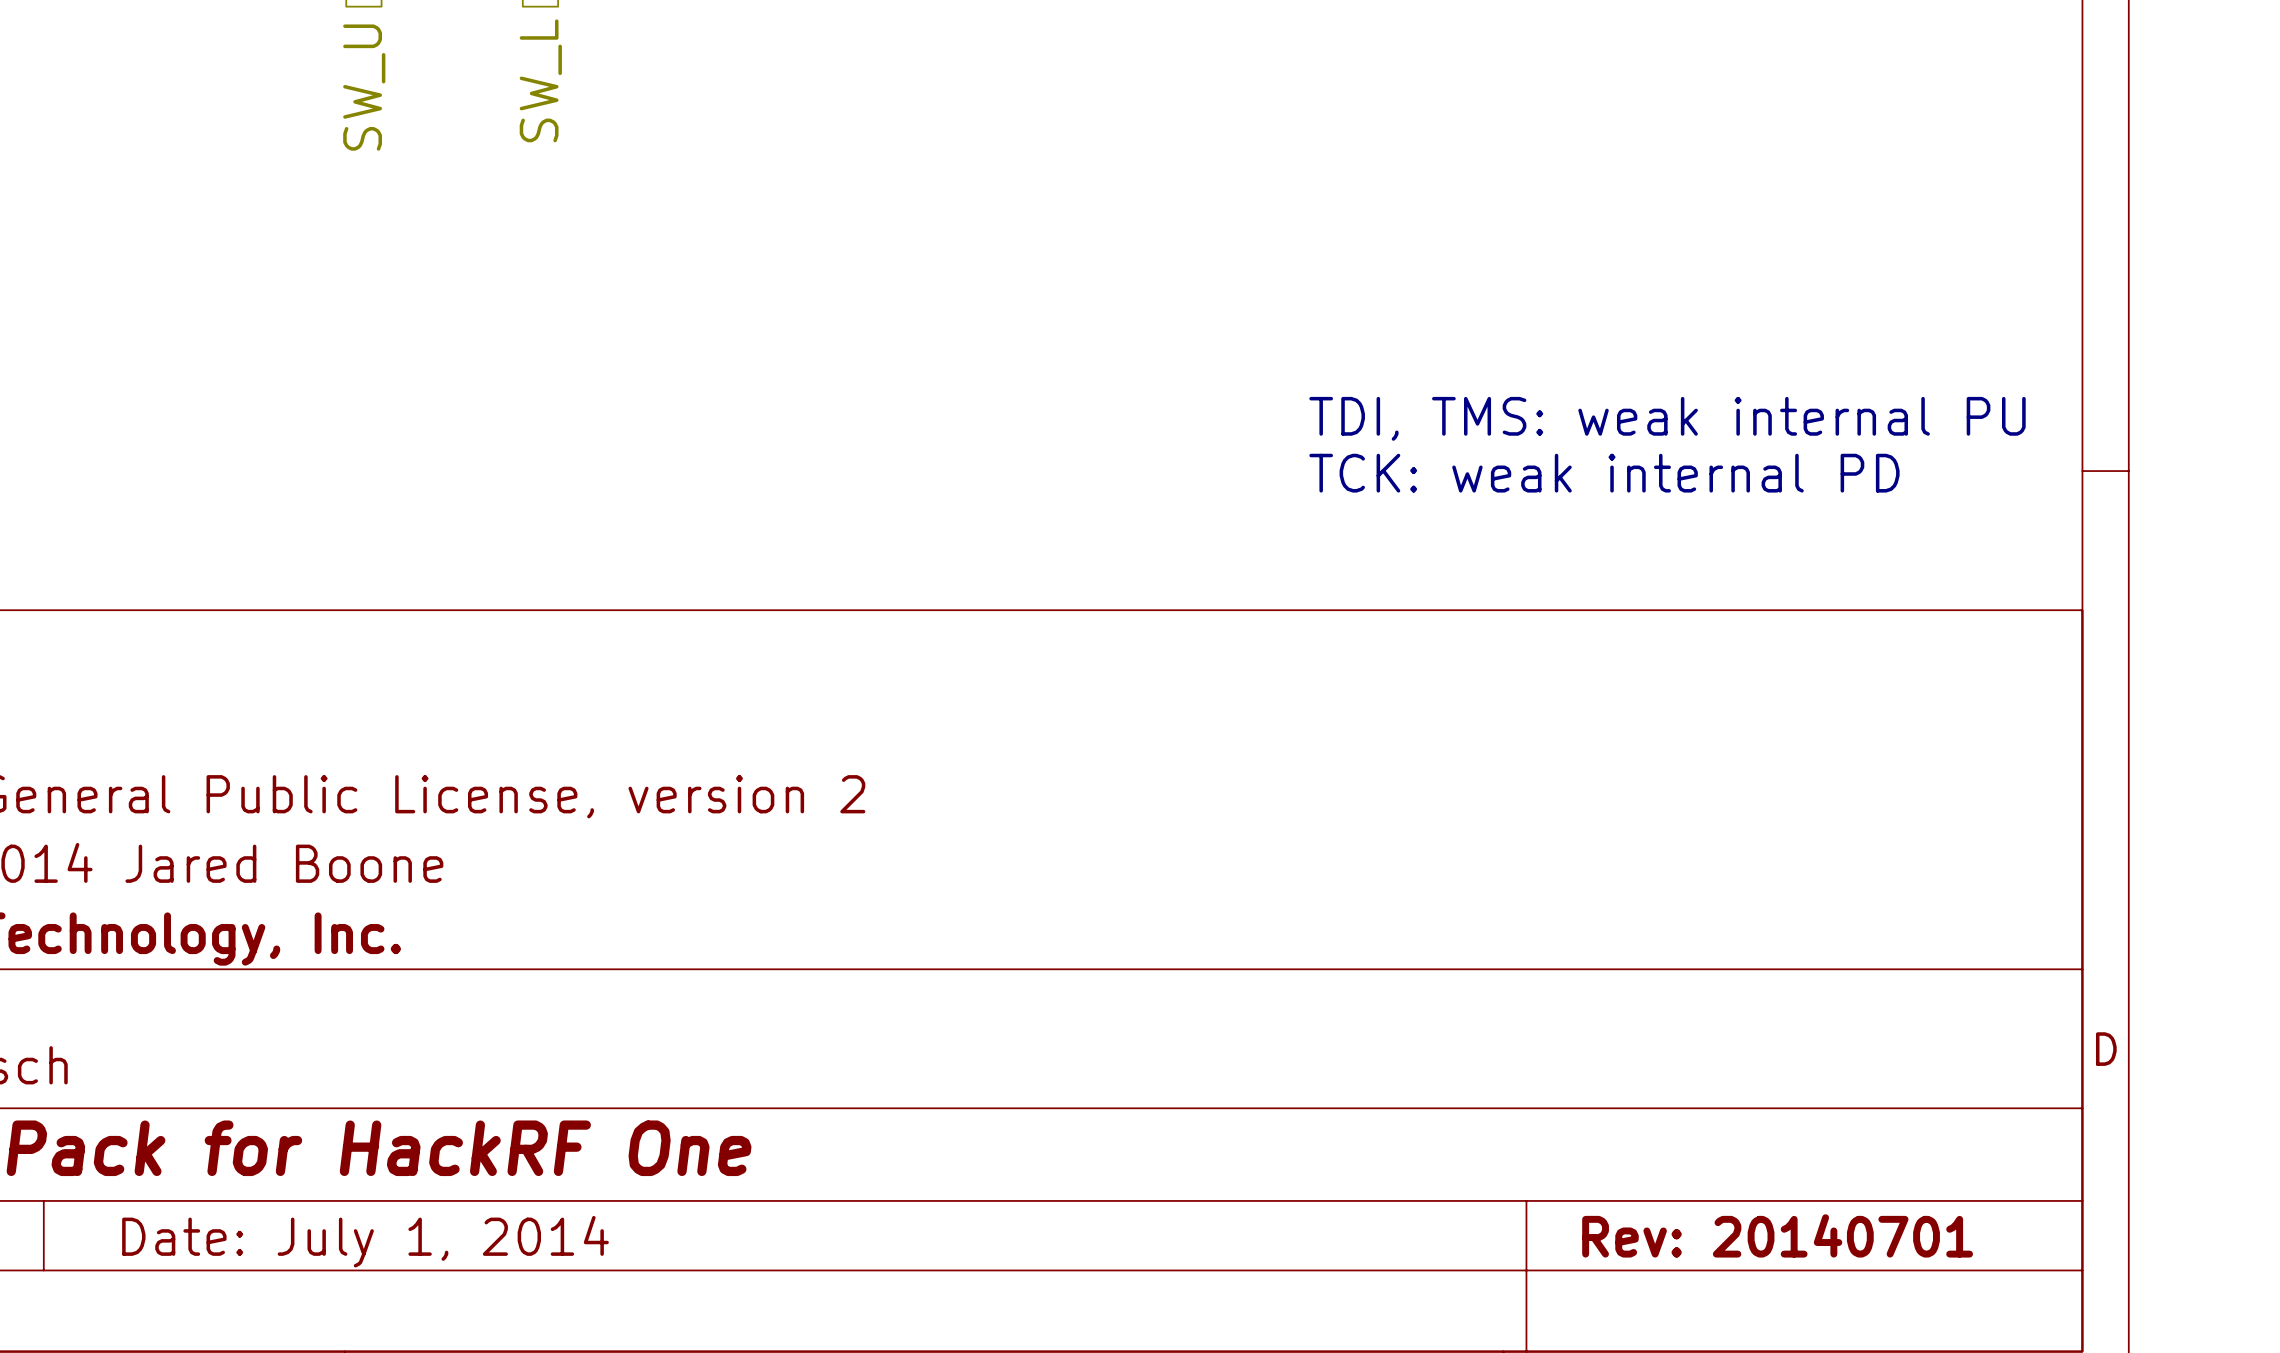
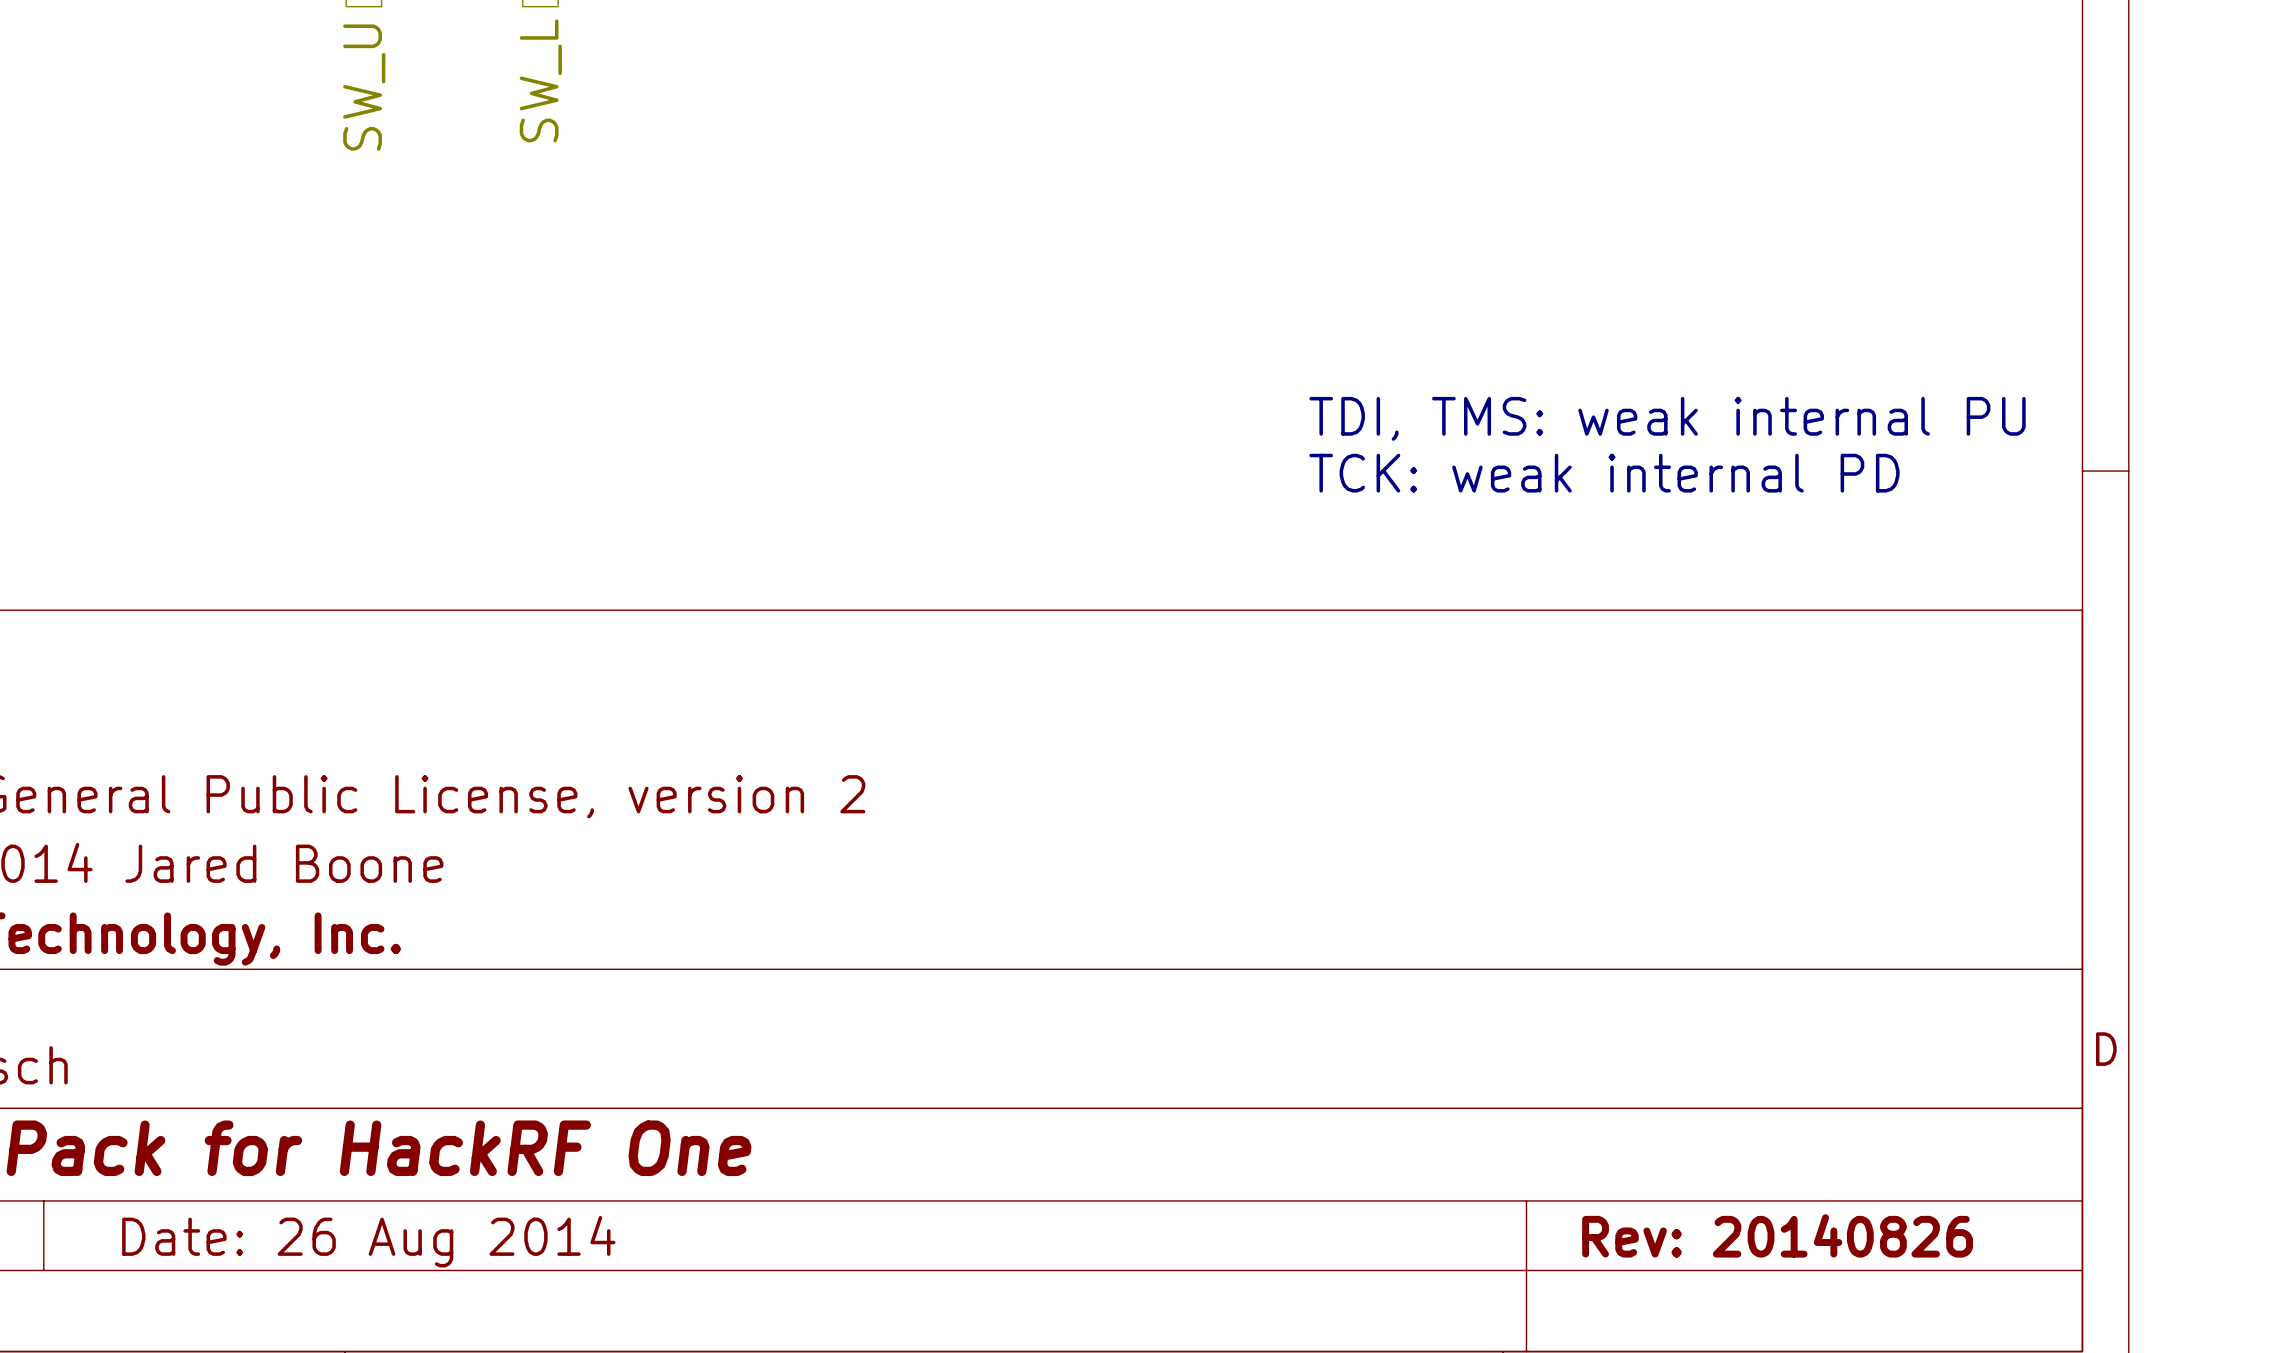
title block: Rev: 20140701 (1777, 1235) -> Rev: 20140826 (1777, 1235)
title block: Date: July 1, 2014 (365, 1241) -> Date: 26 Aug 2014 (368, 1241)

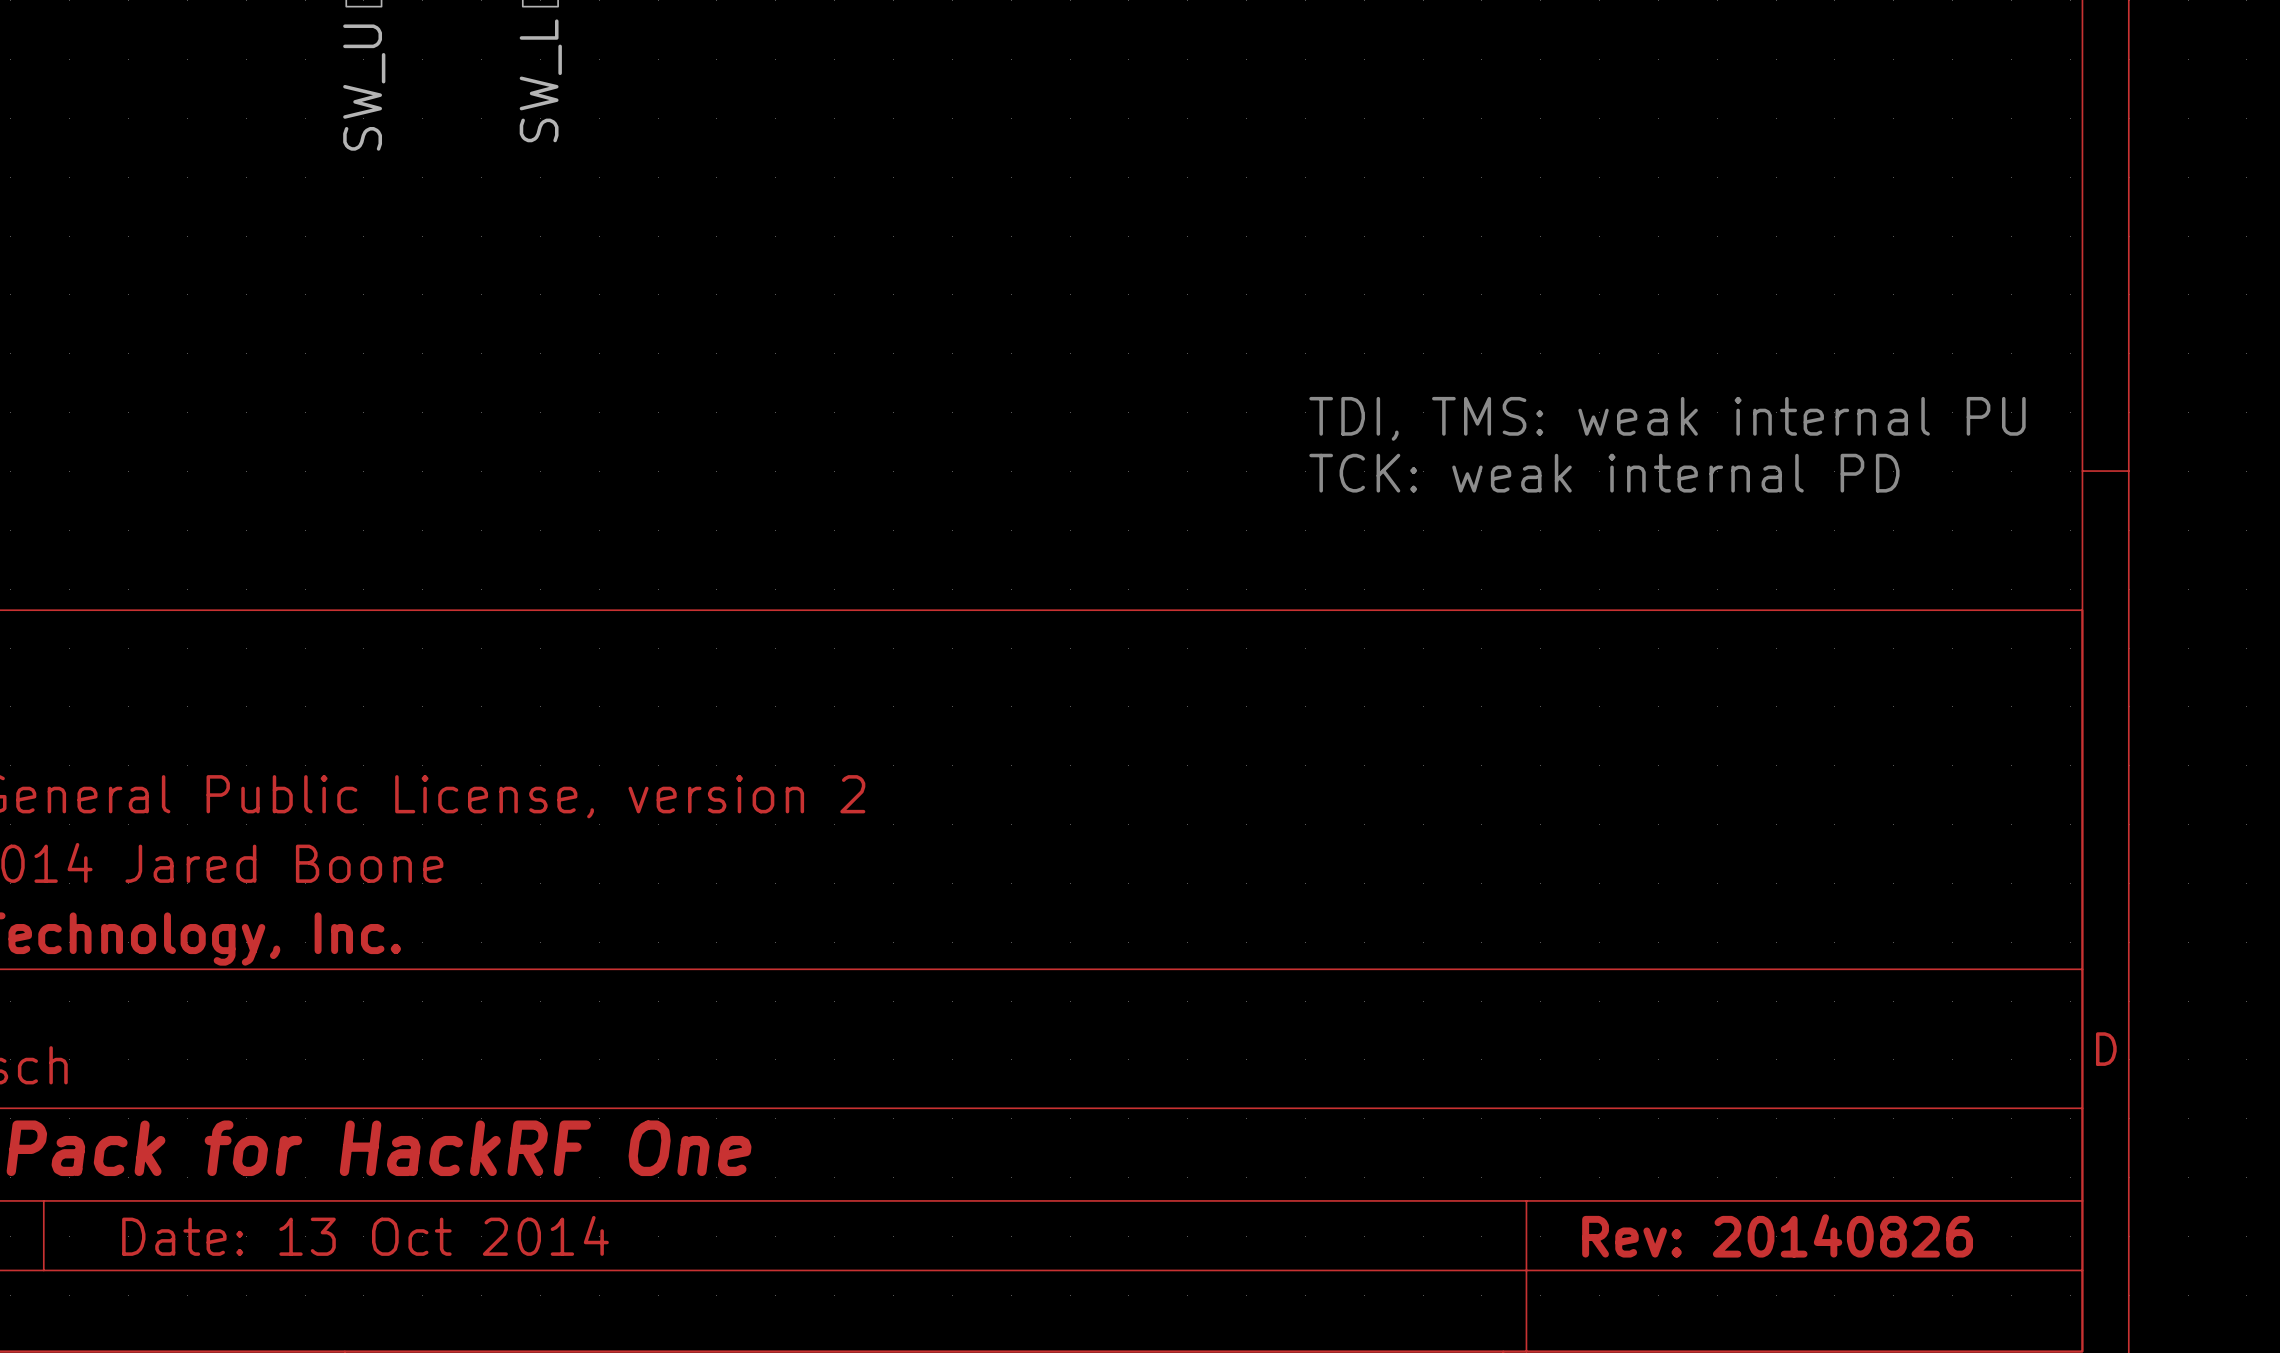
title block: Date: 26 Aug 2014 (368, 1241) -> Date: 13 Oct 2014 (365, 1235)

